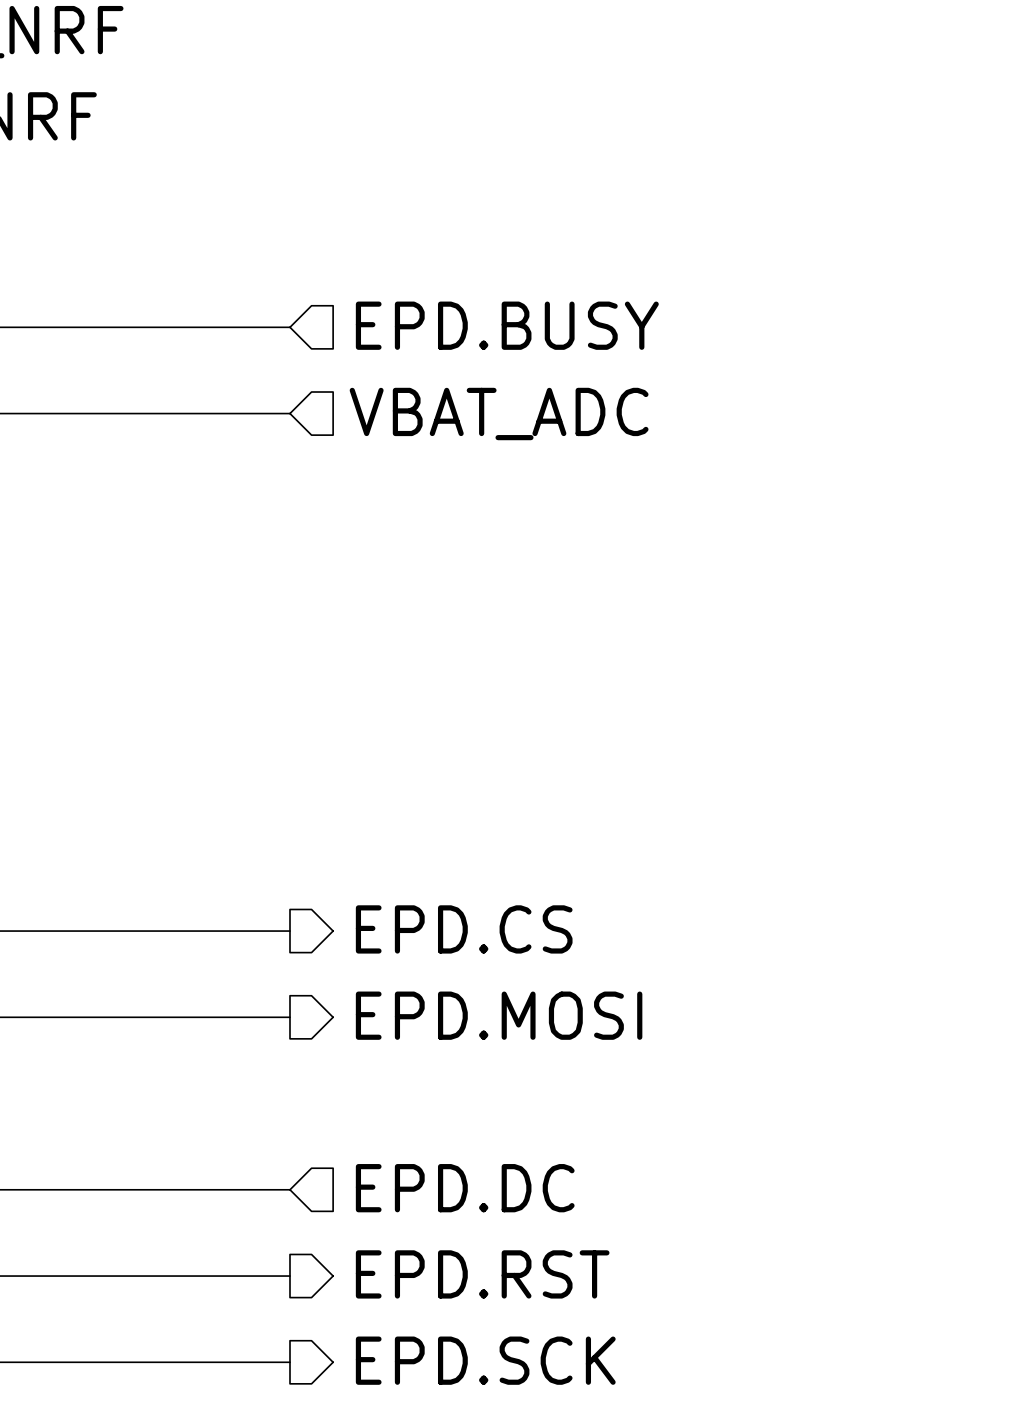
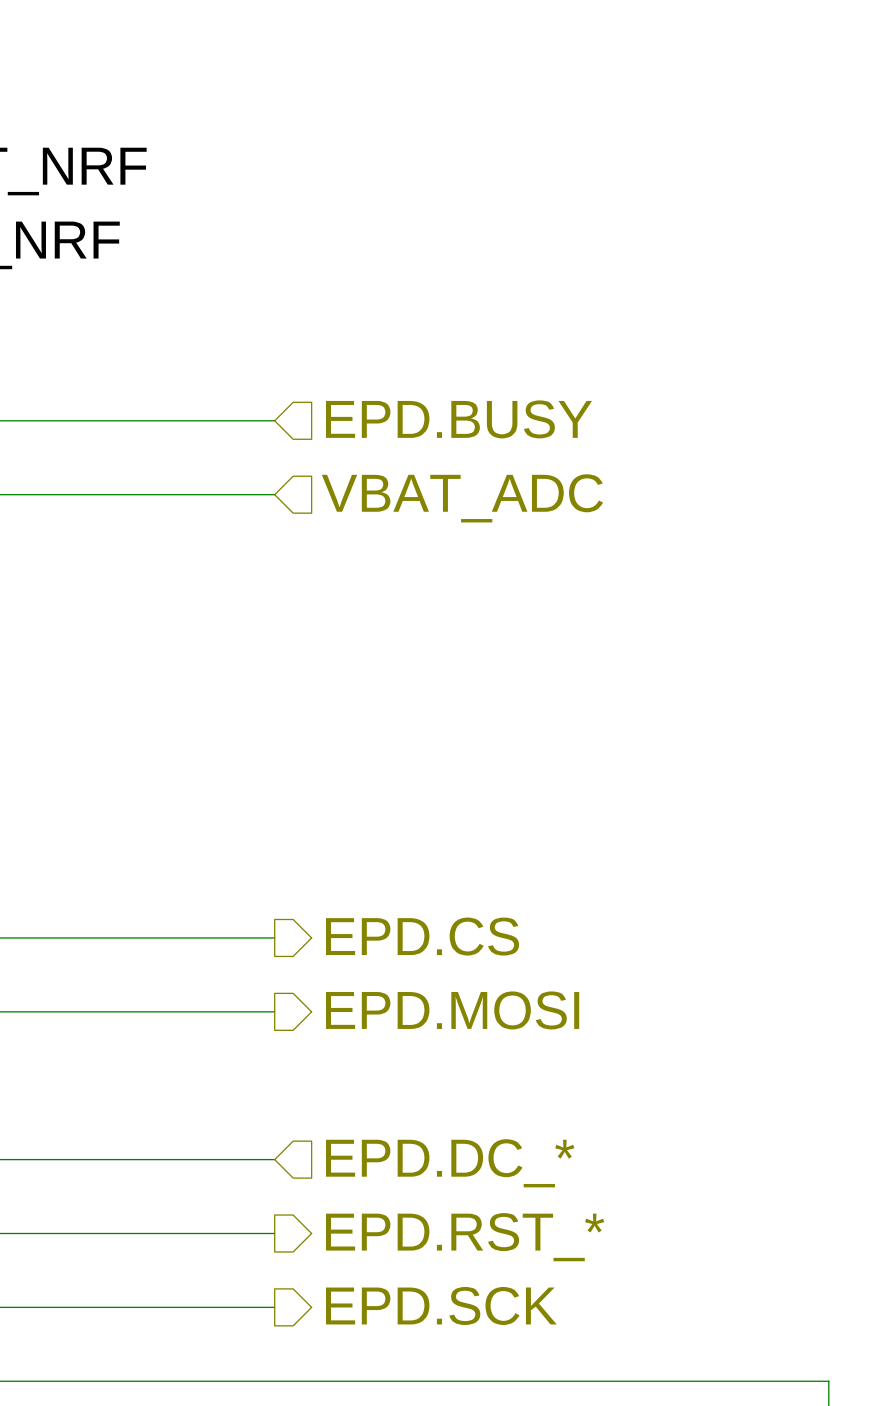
hierarchical label: EPD.DC (465, 1188) -> EPD.DC_* (450, 1163)
hierarchical label: EPD.RST (482, 1274) -> EPD.RST_* (465, 1237)

